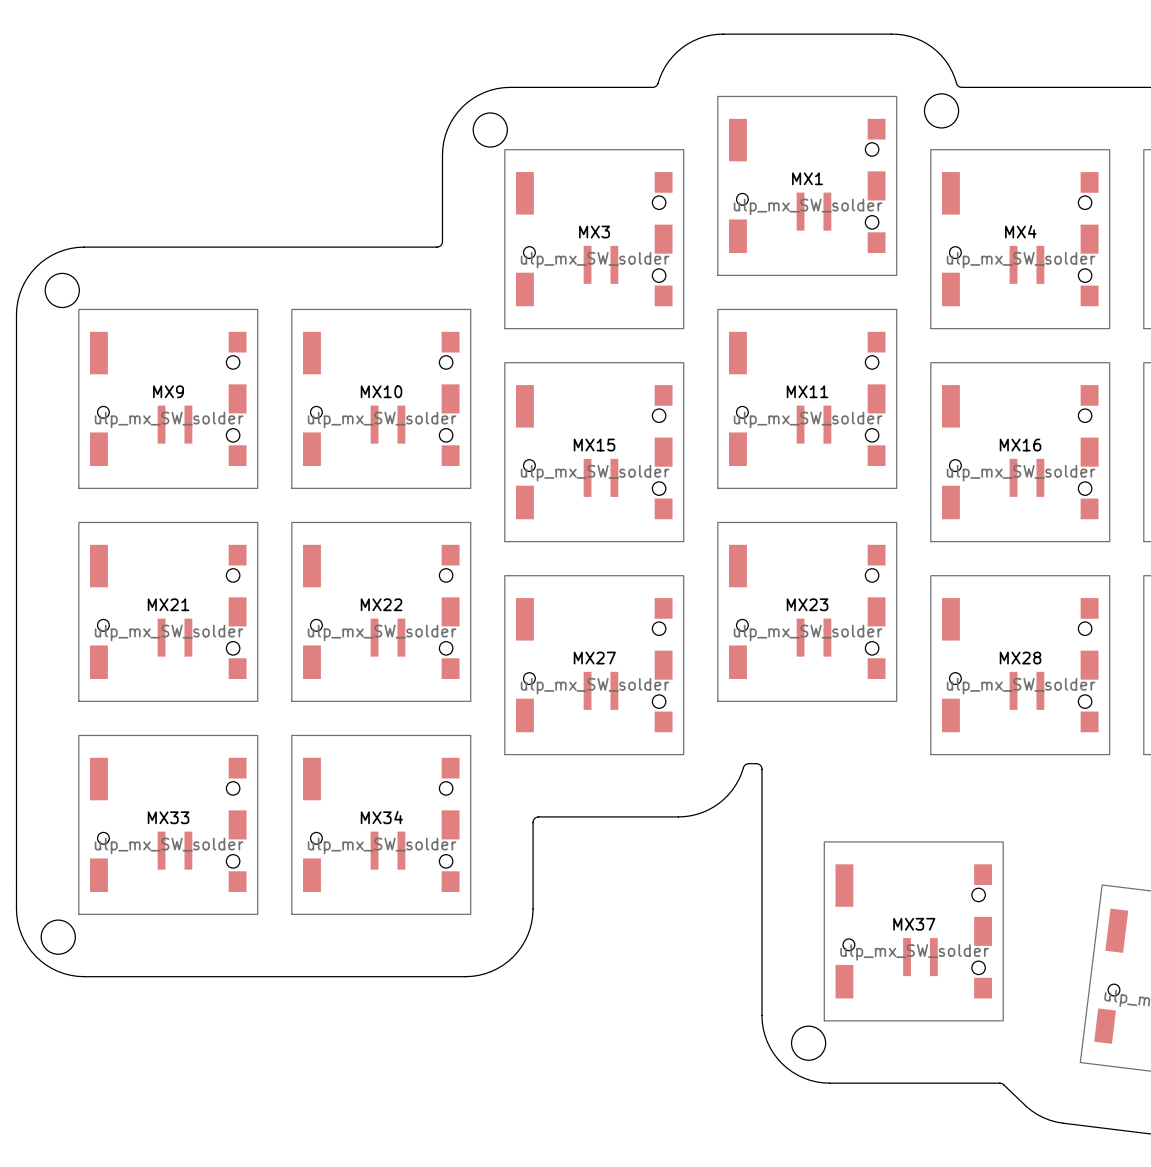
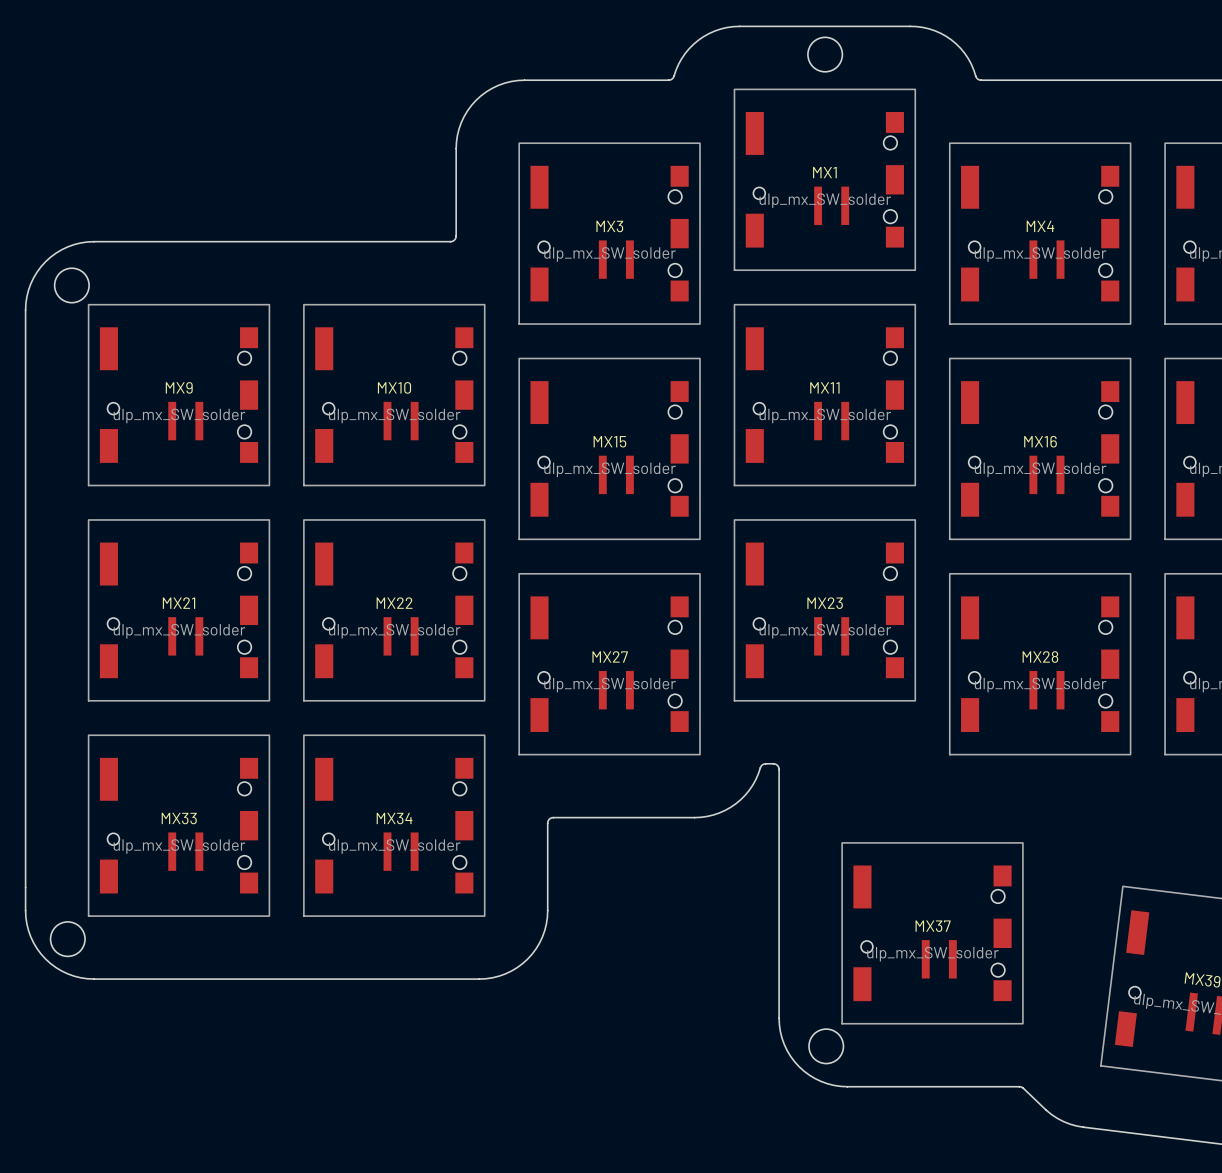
round board edge position: (941, 110) -> (825, 54)
round board edge: [472, 112, 508, 148] -> none

